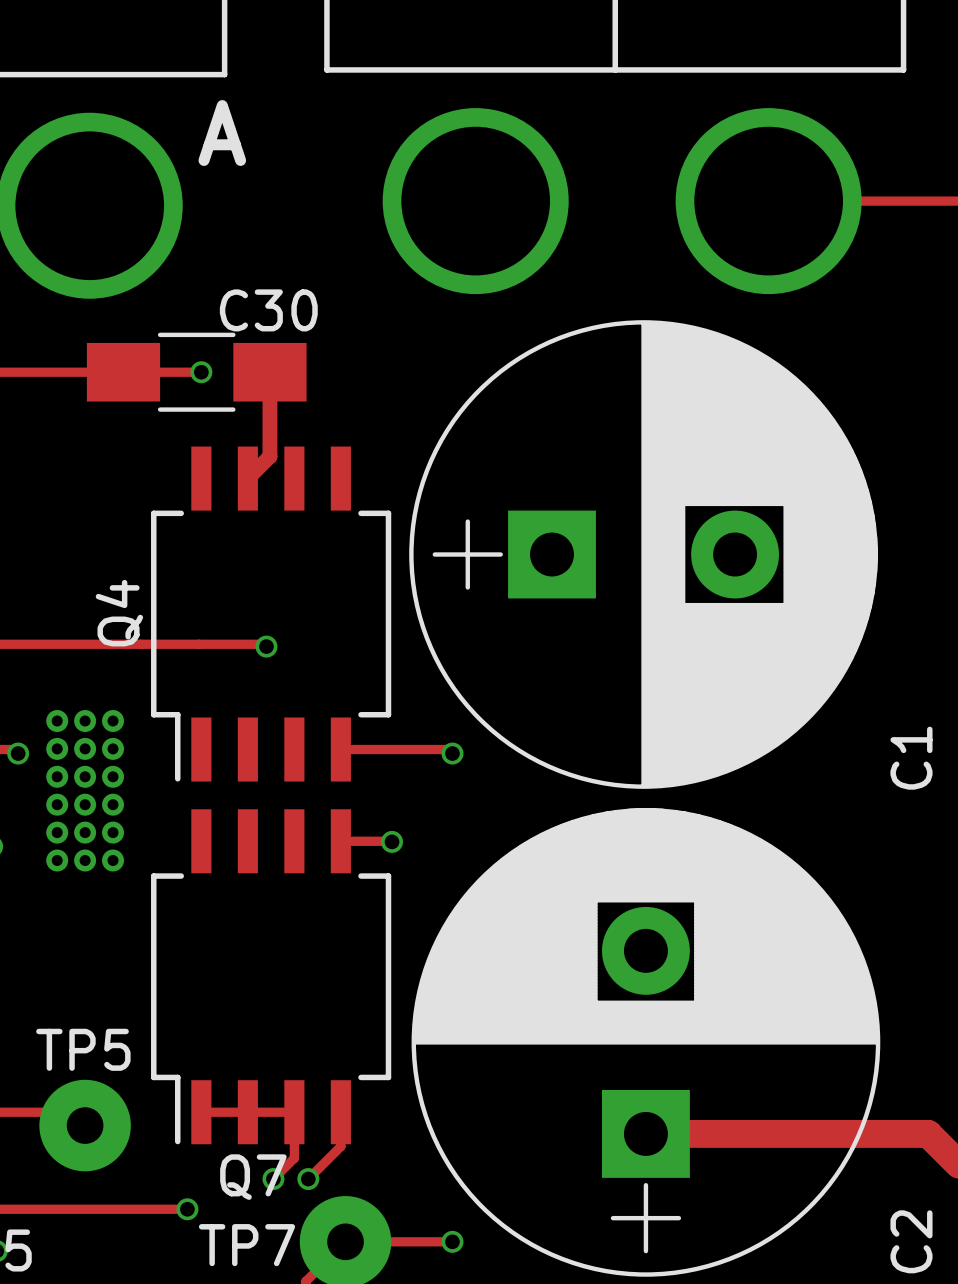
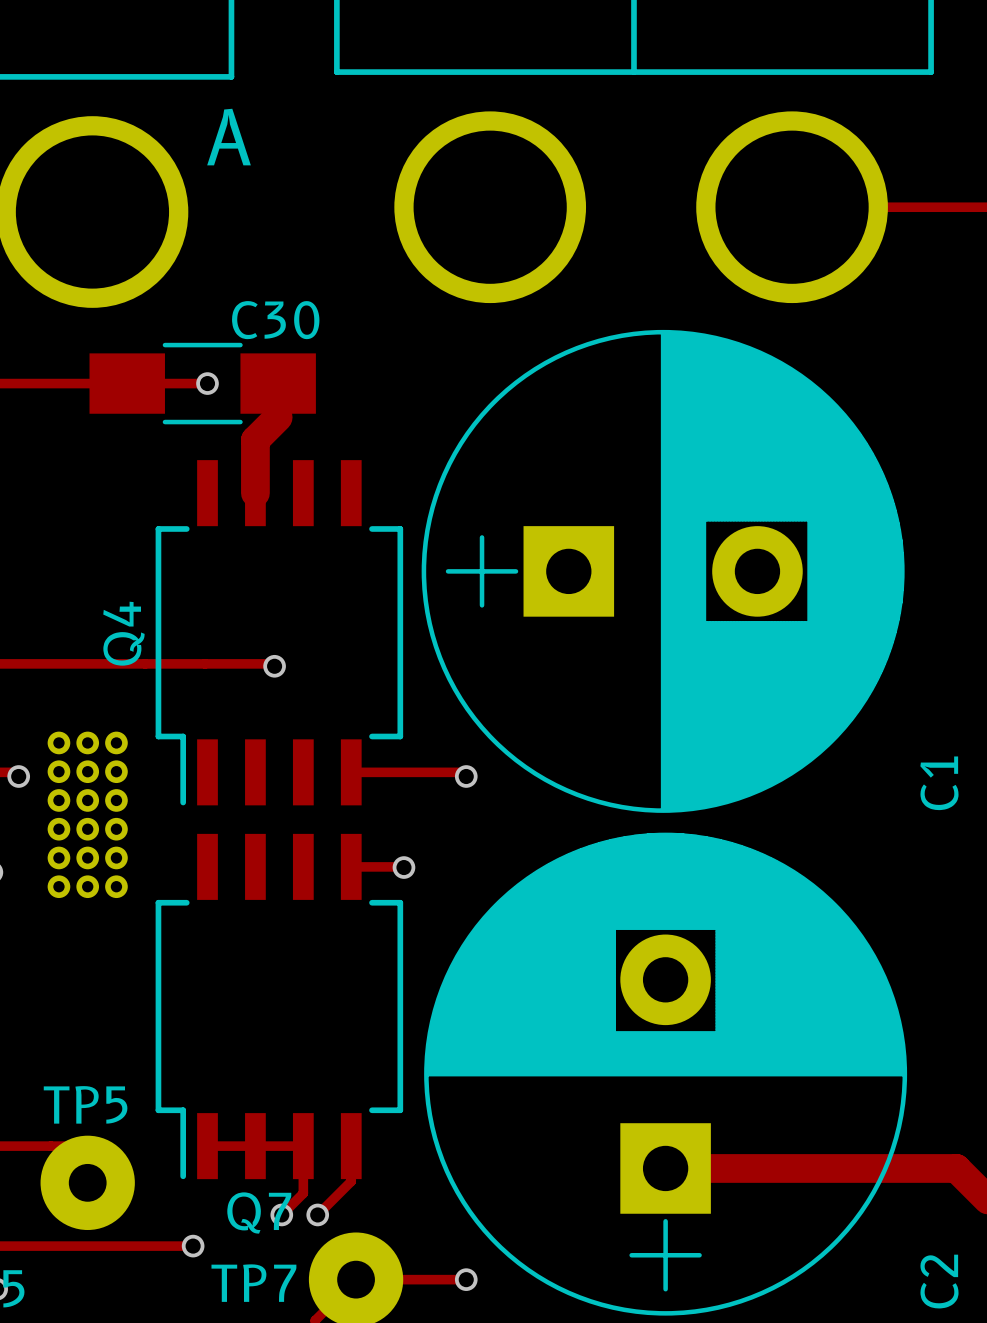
track: (269, 405) (269, 456) (247, 478) -> (278, 417) (255, 440) (255, 493)
TP5 position: (85, 1125) -> (87, 1182)

